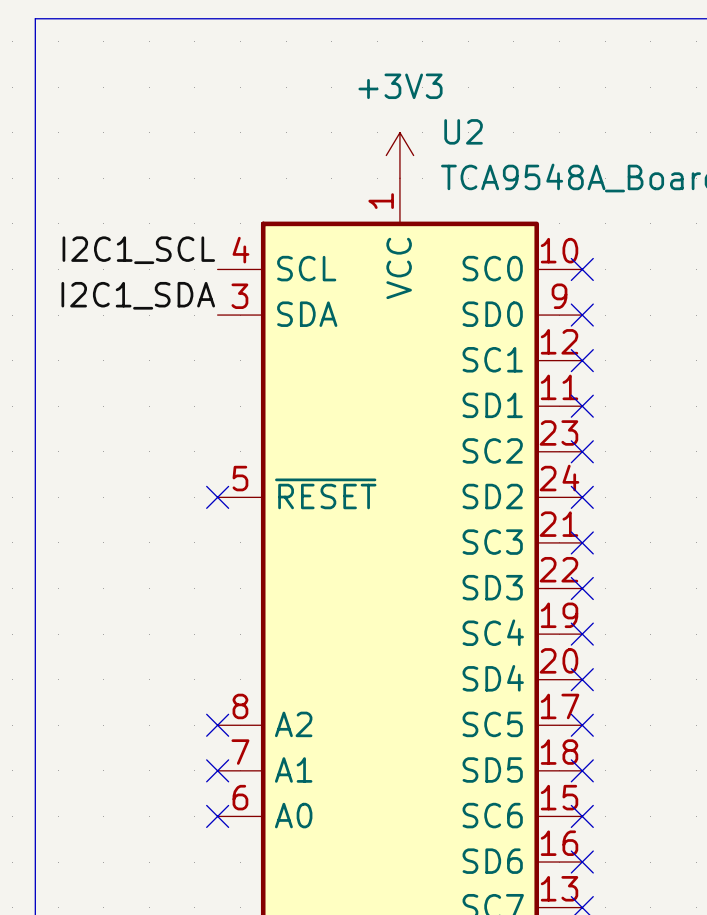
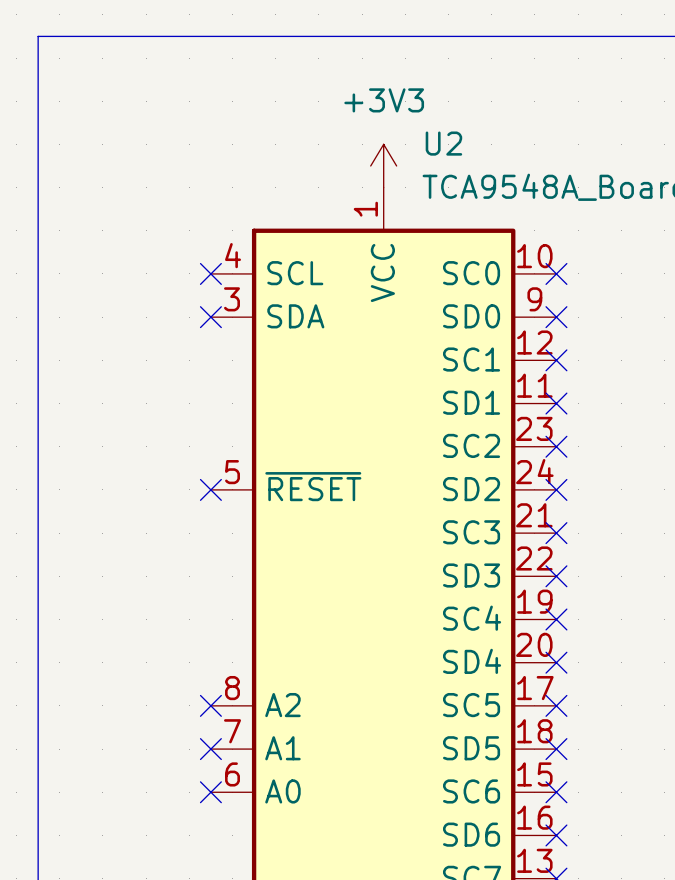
label: I2C1_SCL (138, 250) -> none
no-connect mark: none -> (210, 273)
label: I2C1_SDA (138, 295) -> none
no-connect mark: none -> (210, 317)

